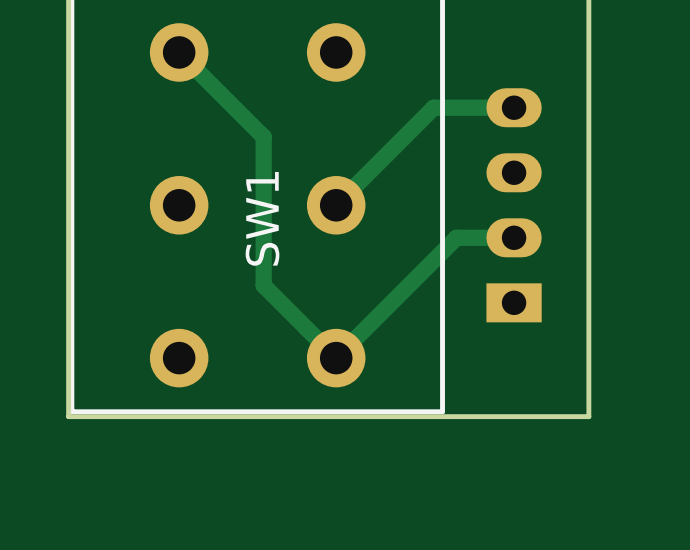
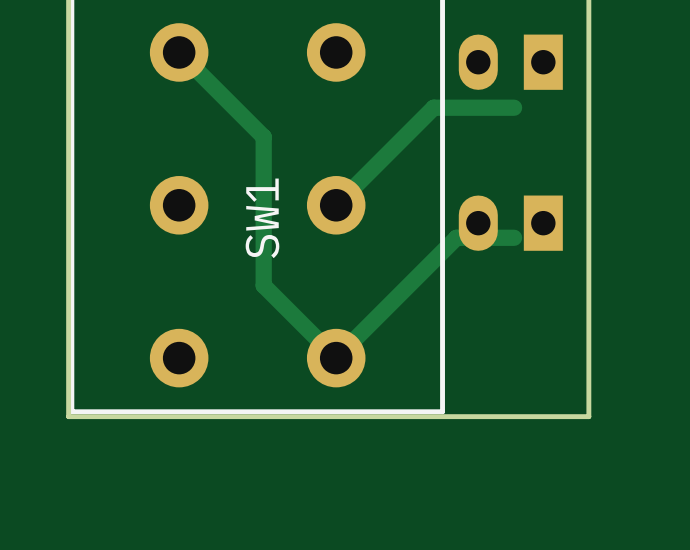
part: none -> (510, 62)
part footprint: [486, 88, 542, 323] -> [458, 195, 563, 251]

